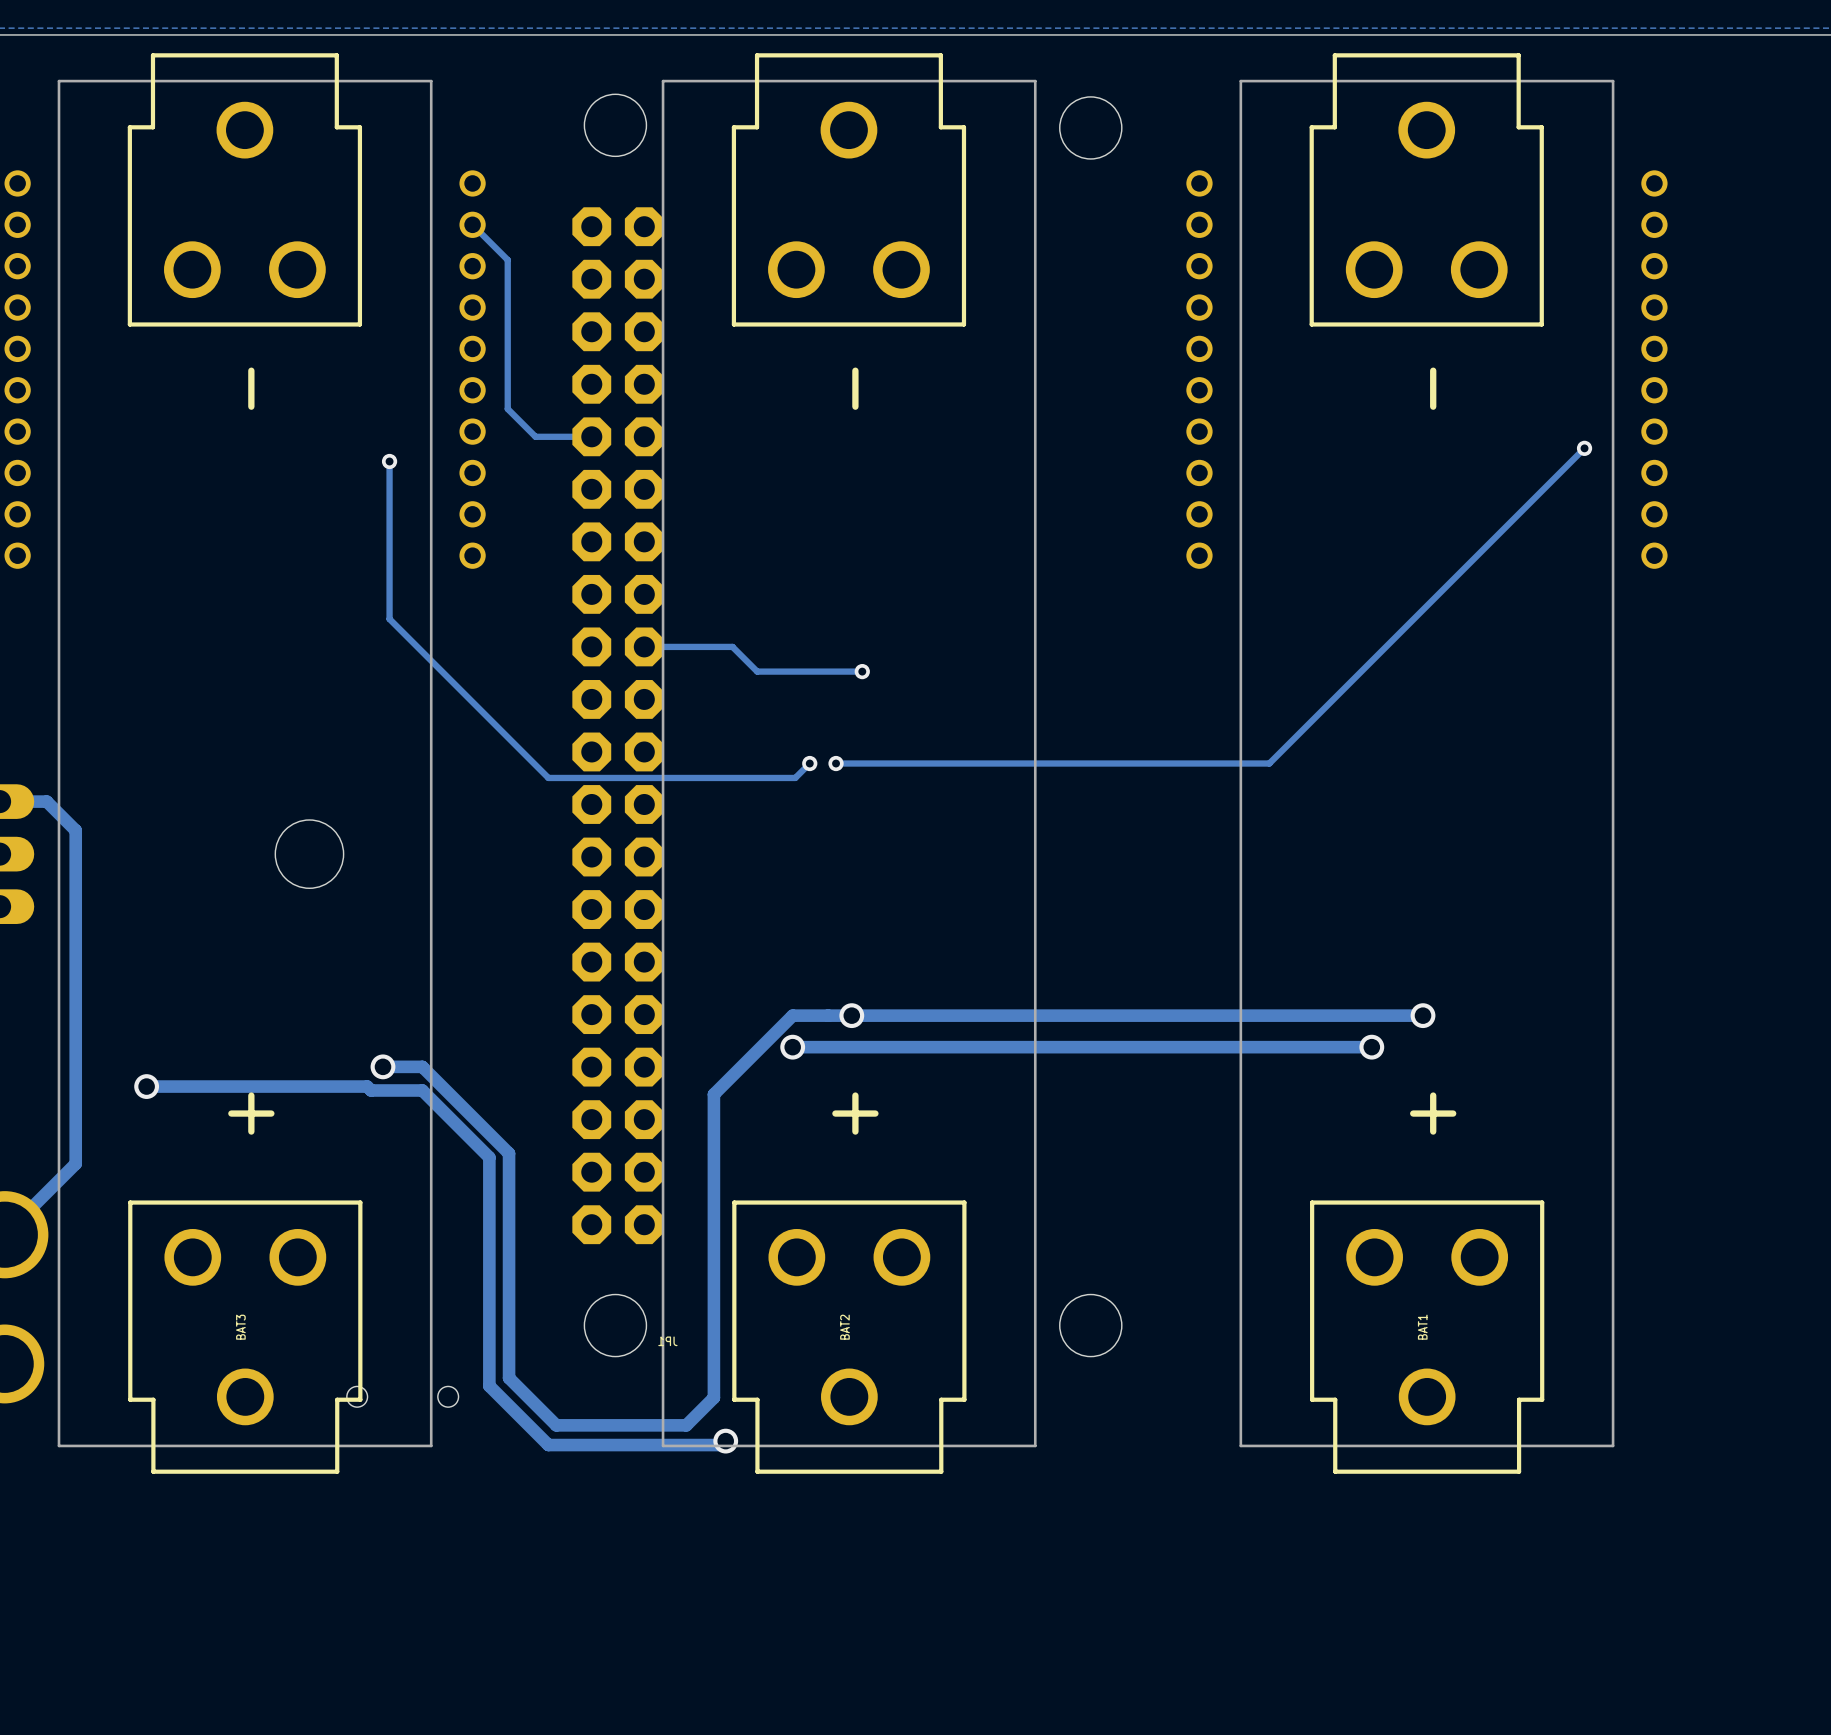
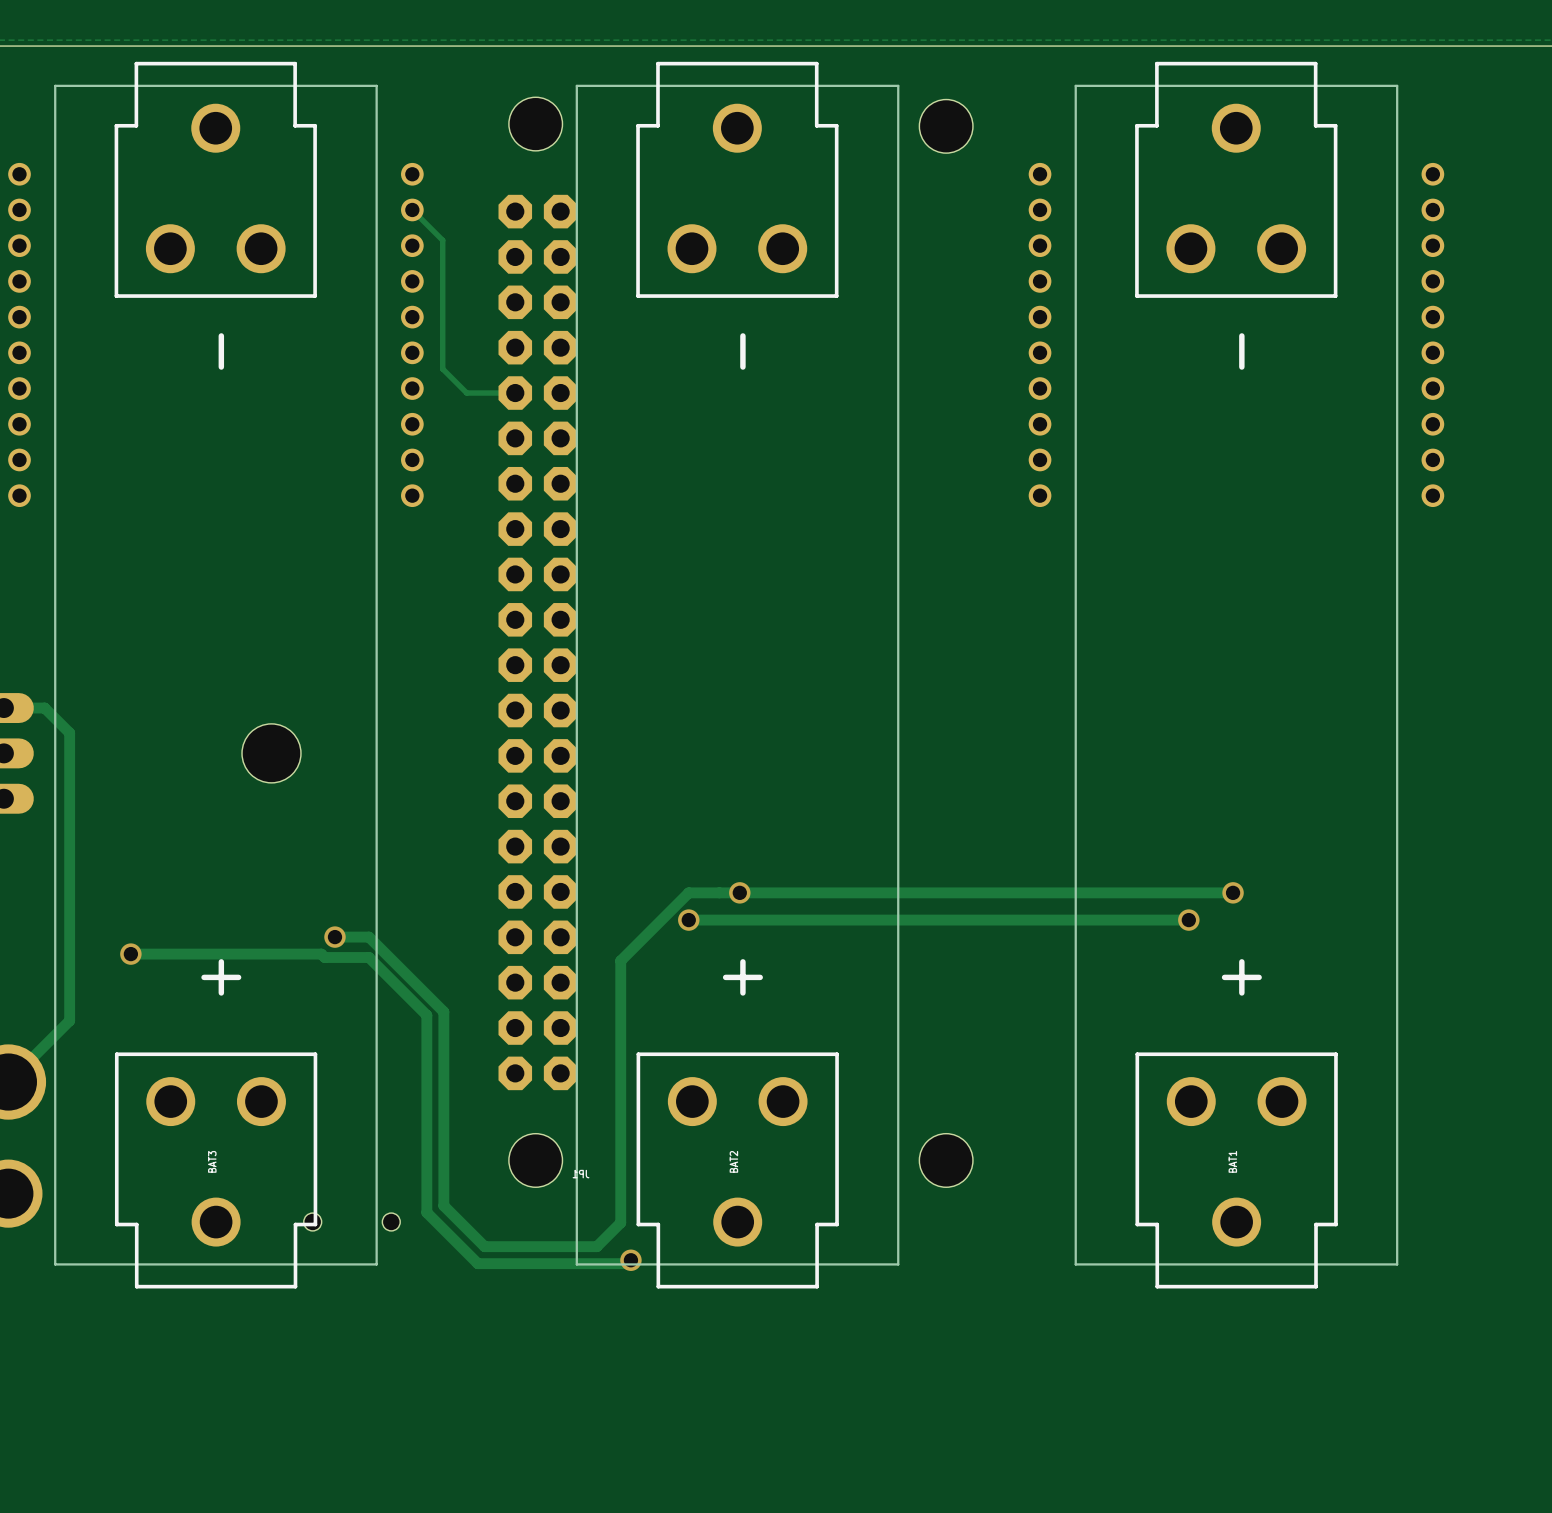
track: (1584, 448) (1269, 763) (836, 763) -> none
via: (1584, 448) -> none
track: (389, 461) (389, 619) (548, 777) (795, 777) (809, 763) -> none
via: (389, 461) -> none
track: (644, 646) (732, 646) (757, 671) (862, 671) -> none
via: (862, 671) -> none
via: (809, 763) -> none
via: (836, 763) -> none

